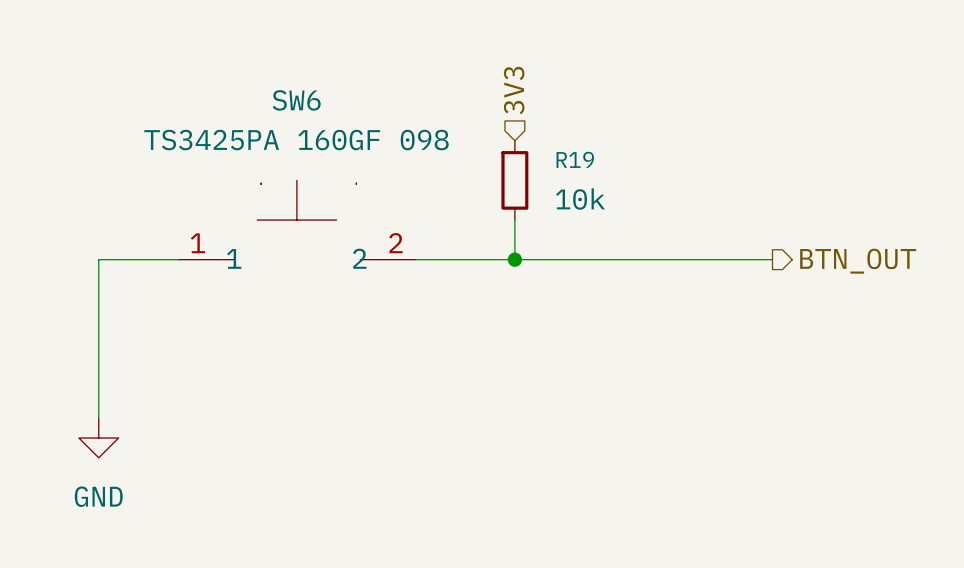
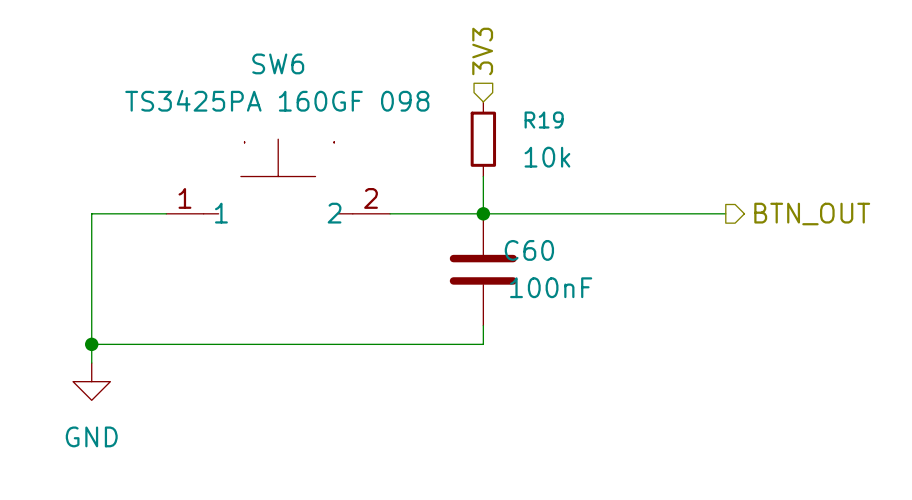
C60: none -> 100nF (483, 269)
wire: none -> (483, 325) (483, 344) (91, 344)
junction: none -> (91, 344)

